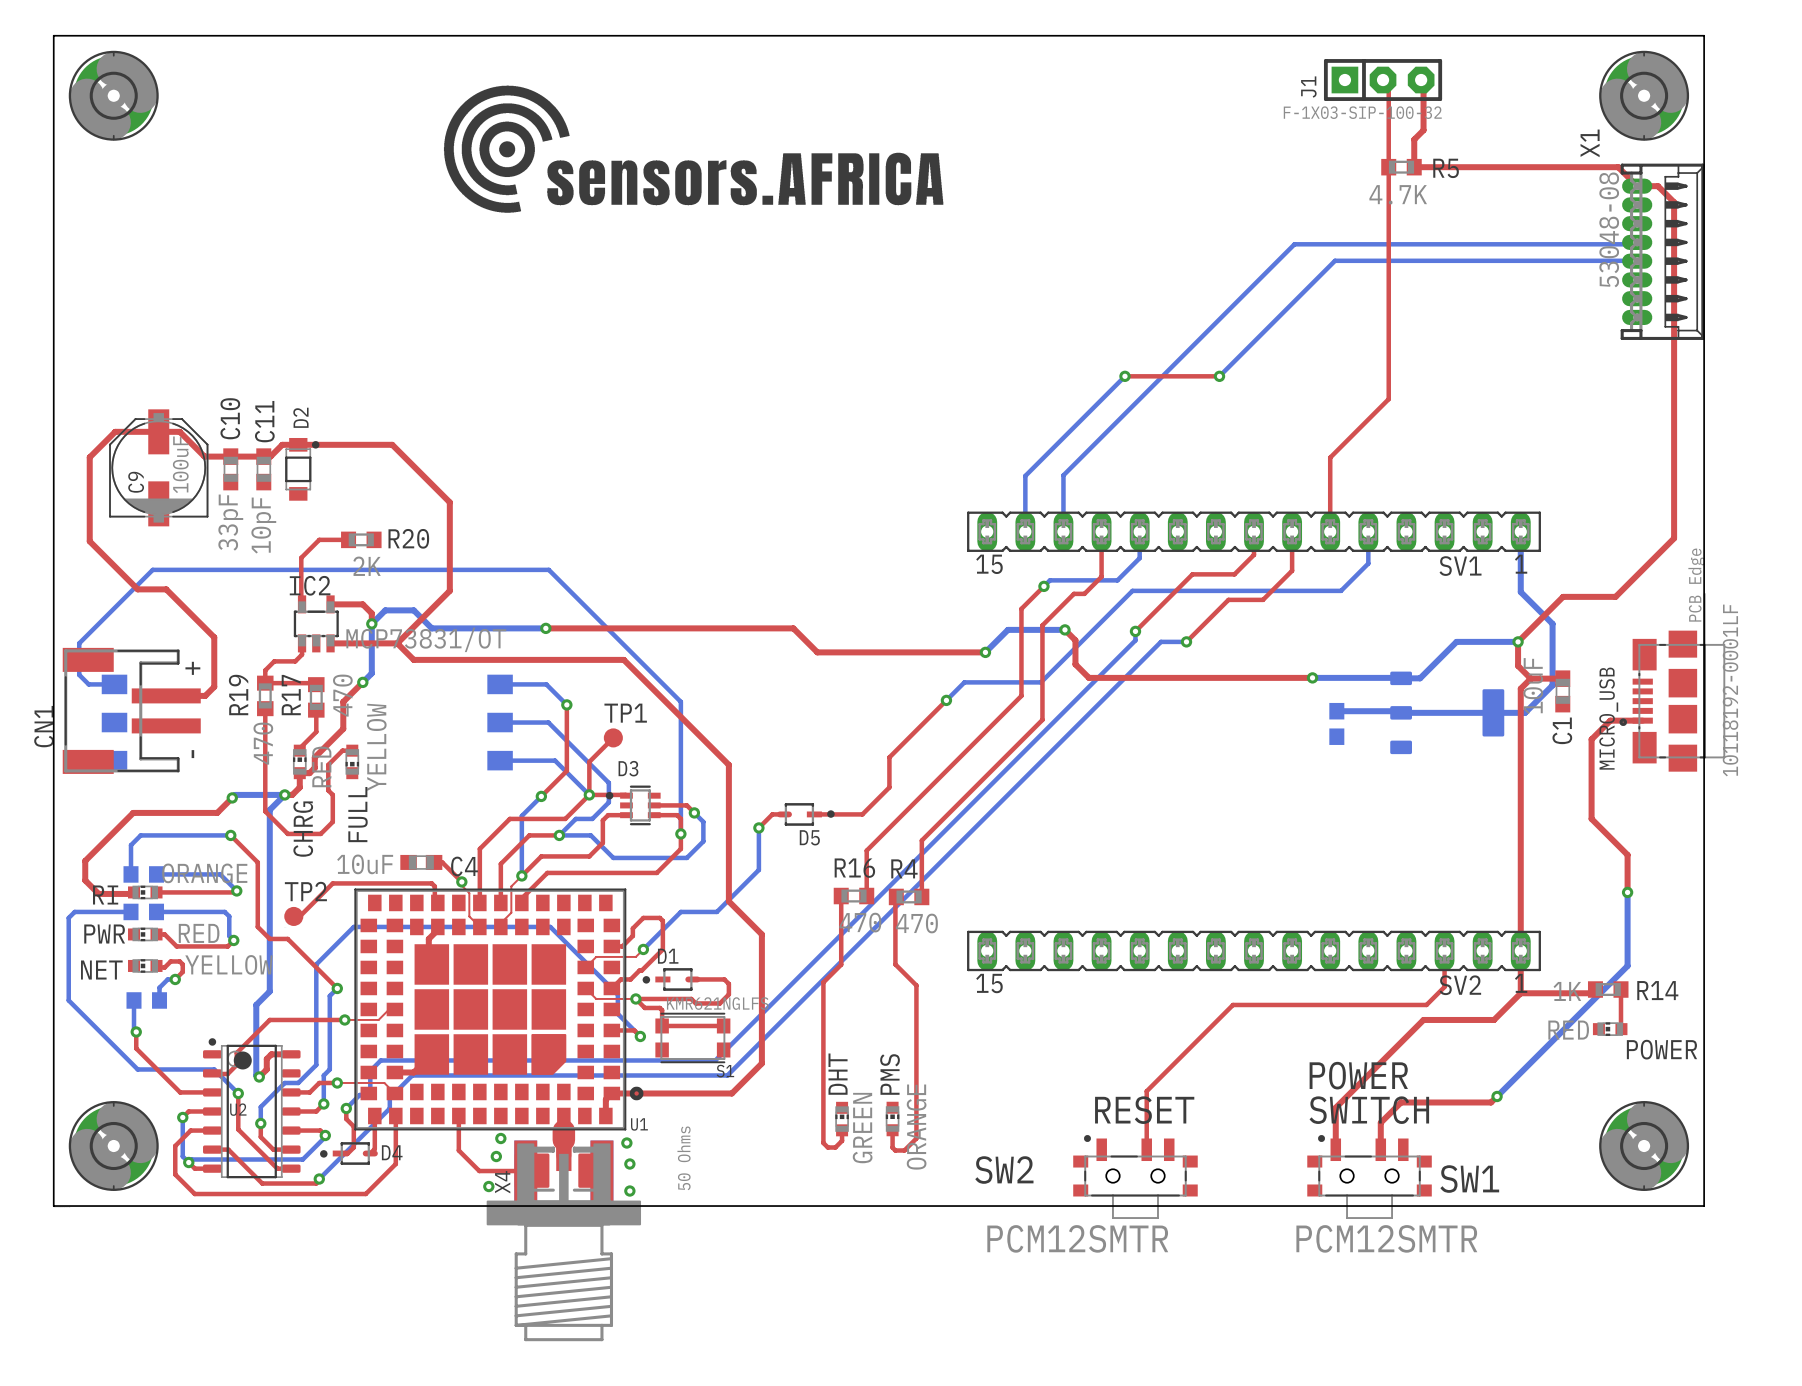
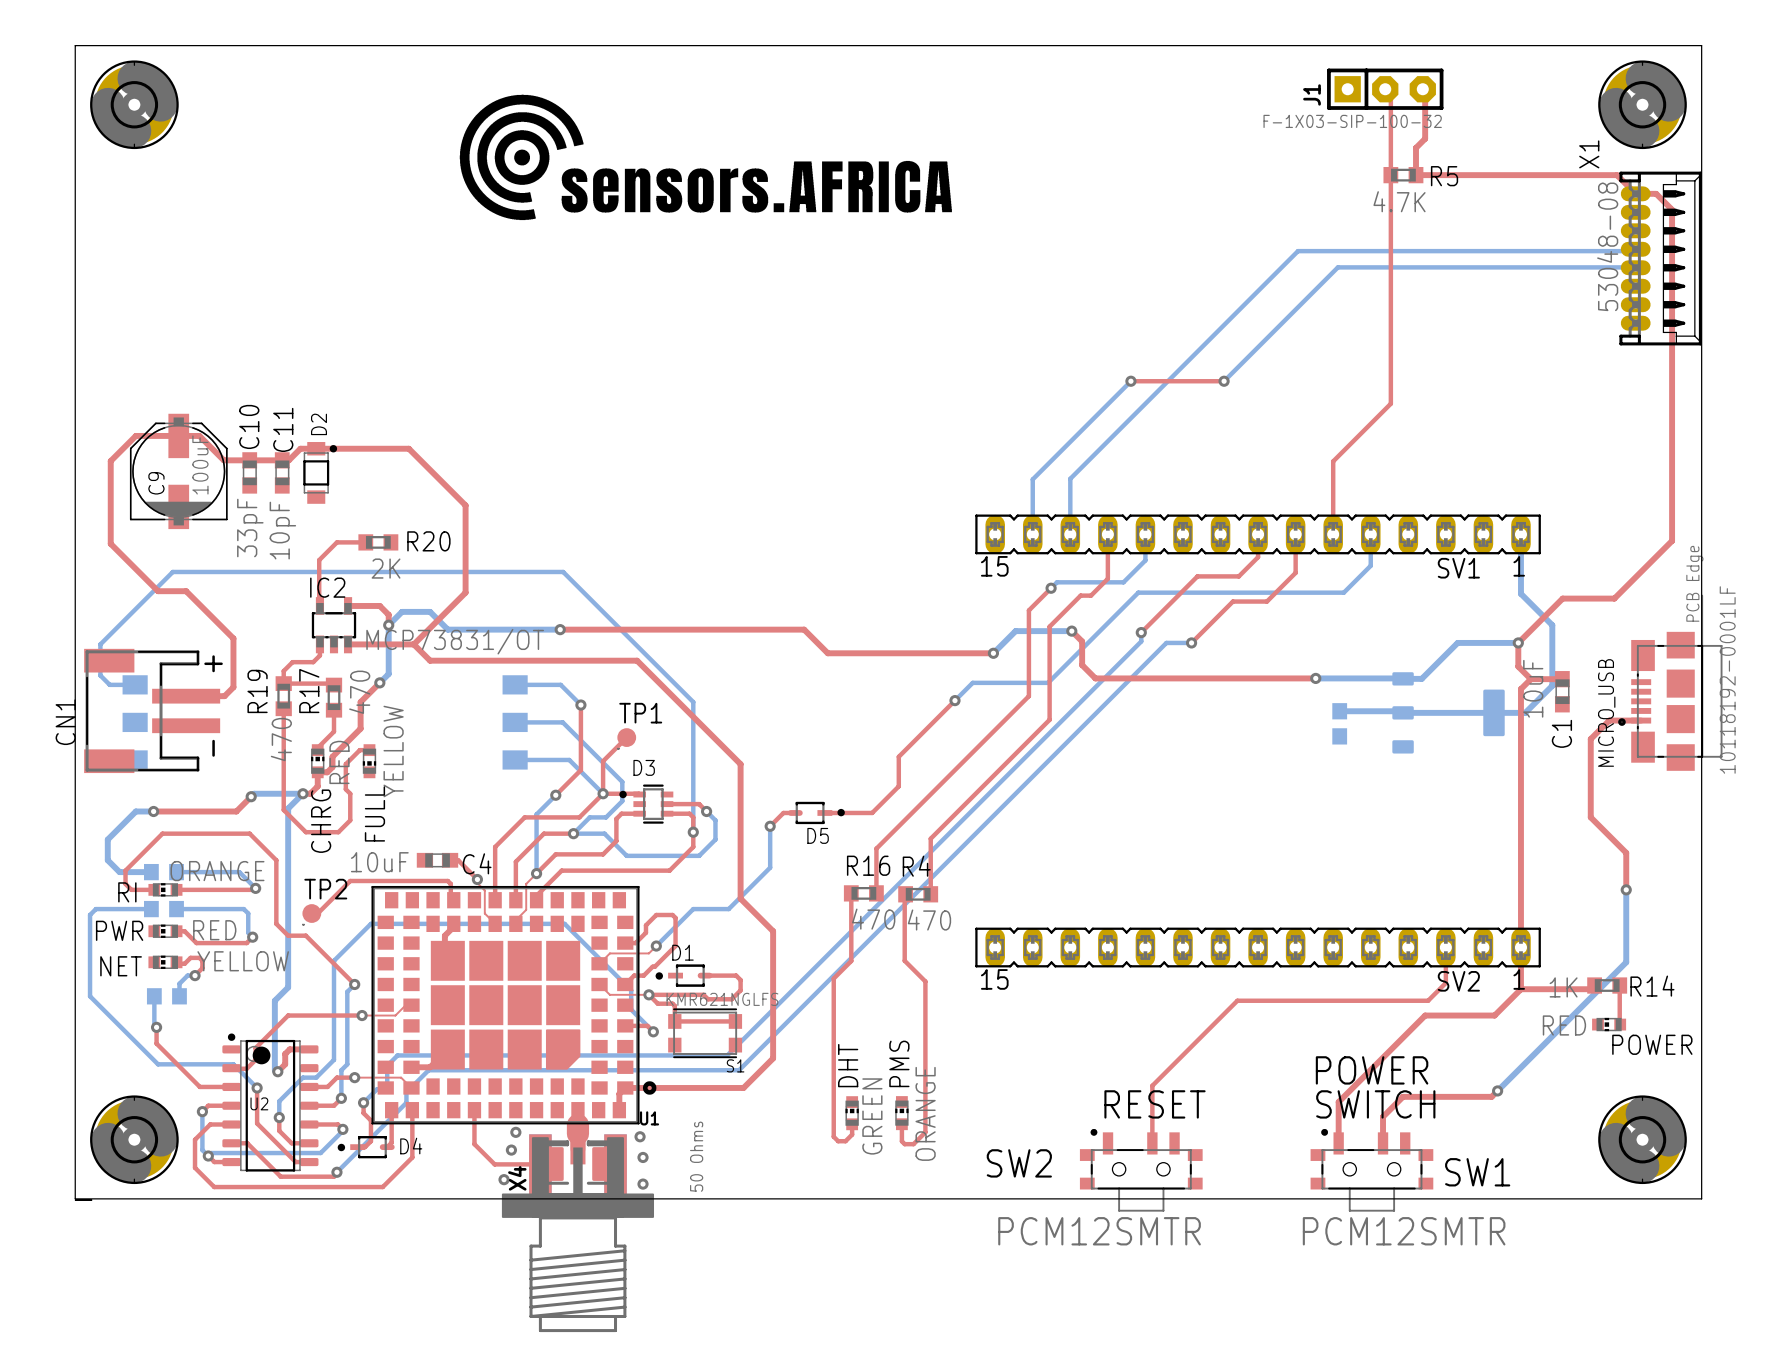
top track: (133, 812) (85, 860) (85, 880) (98, 893) (134, 892) -> (249, 833) (162, 833) (125, 870) (125, 883) (131, 889) (154, 889)
via: none -> (153, 811)
bottom track: (230, 835) (140, 835) (131, 845) (131, 874) -> (153, 811) (135, 811) (107, 839) (107, 860) (119, 872) (151, 872)
via: (230, 835) -> none

